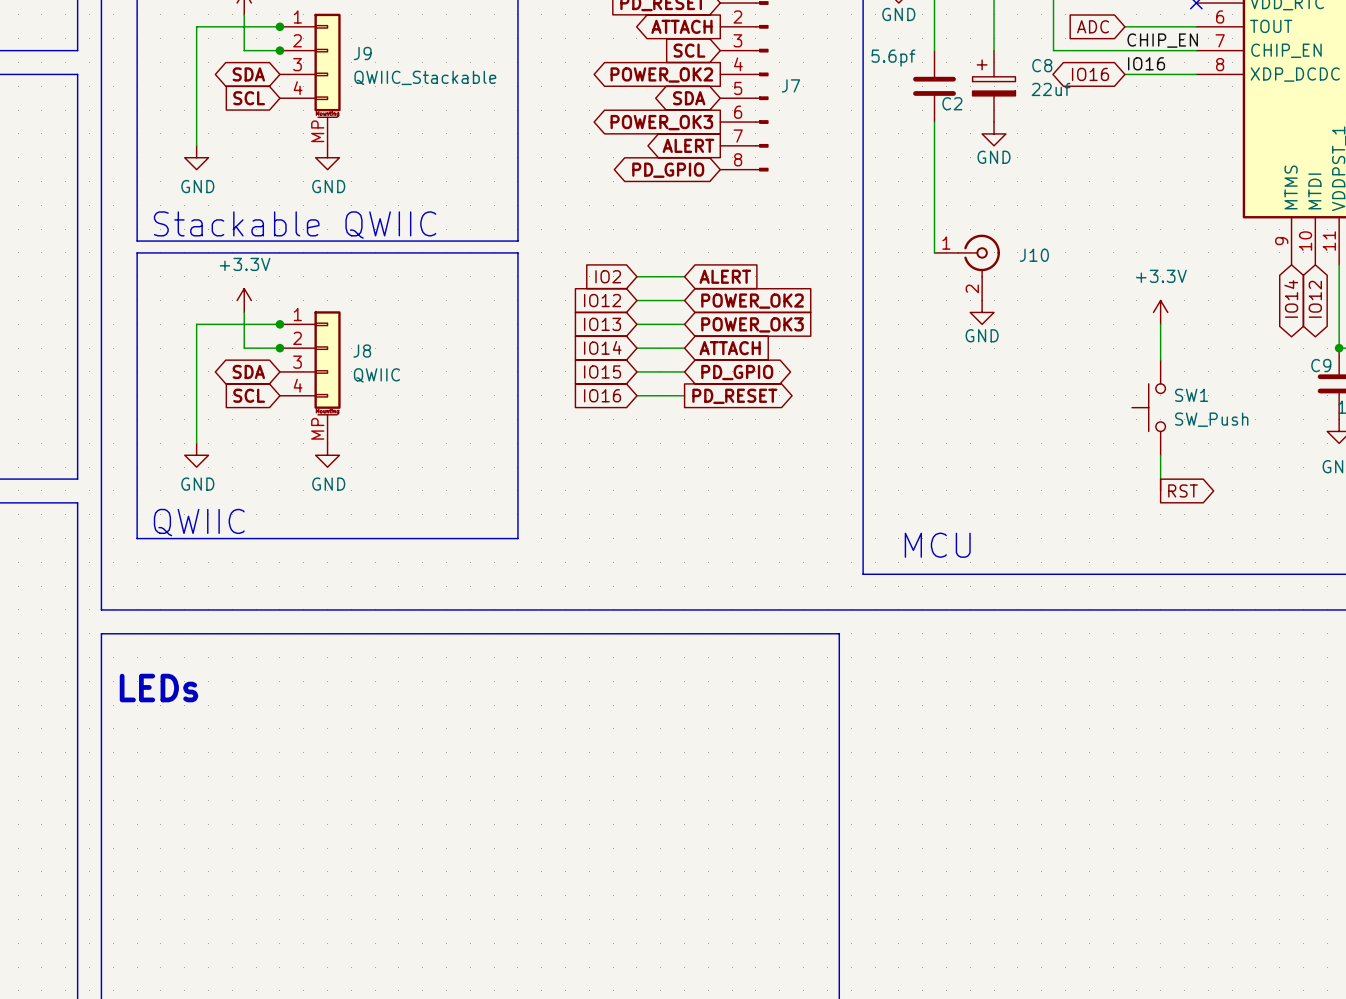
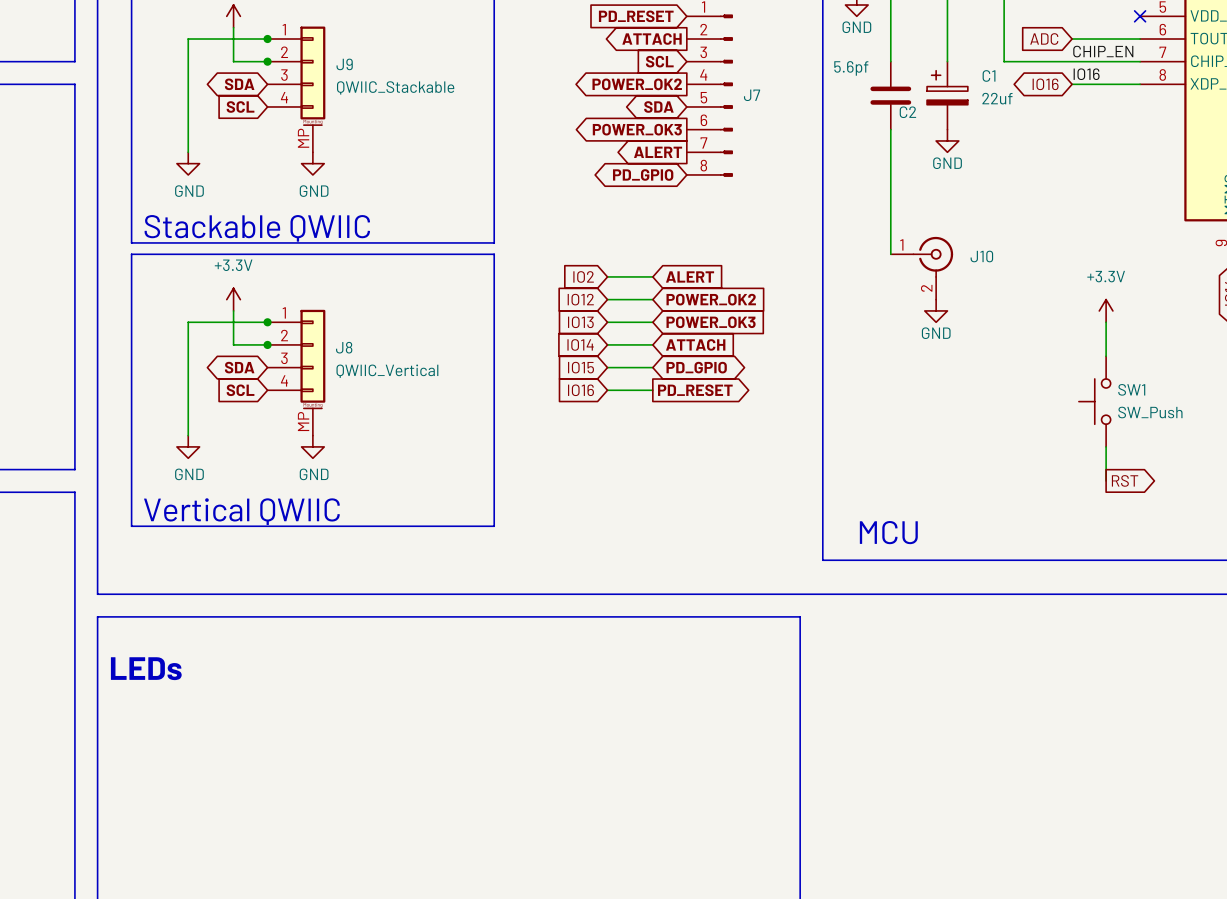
C8 name: C8 (1042, 65) -> C1 (989, 75)
J8 value: QWIIC (376, 375) -> QWIIC_Vertical (387, 371)
text: QWIIC (199, 522) -> Vertical QWIIC (241, 511)

